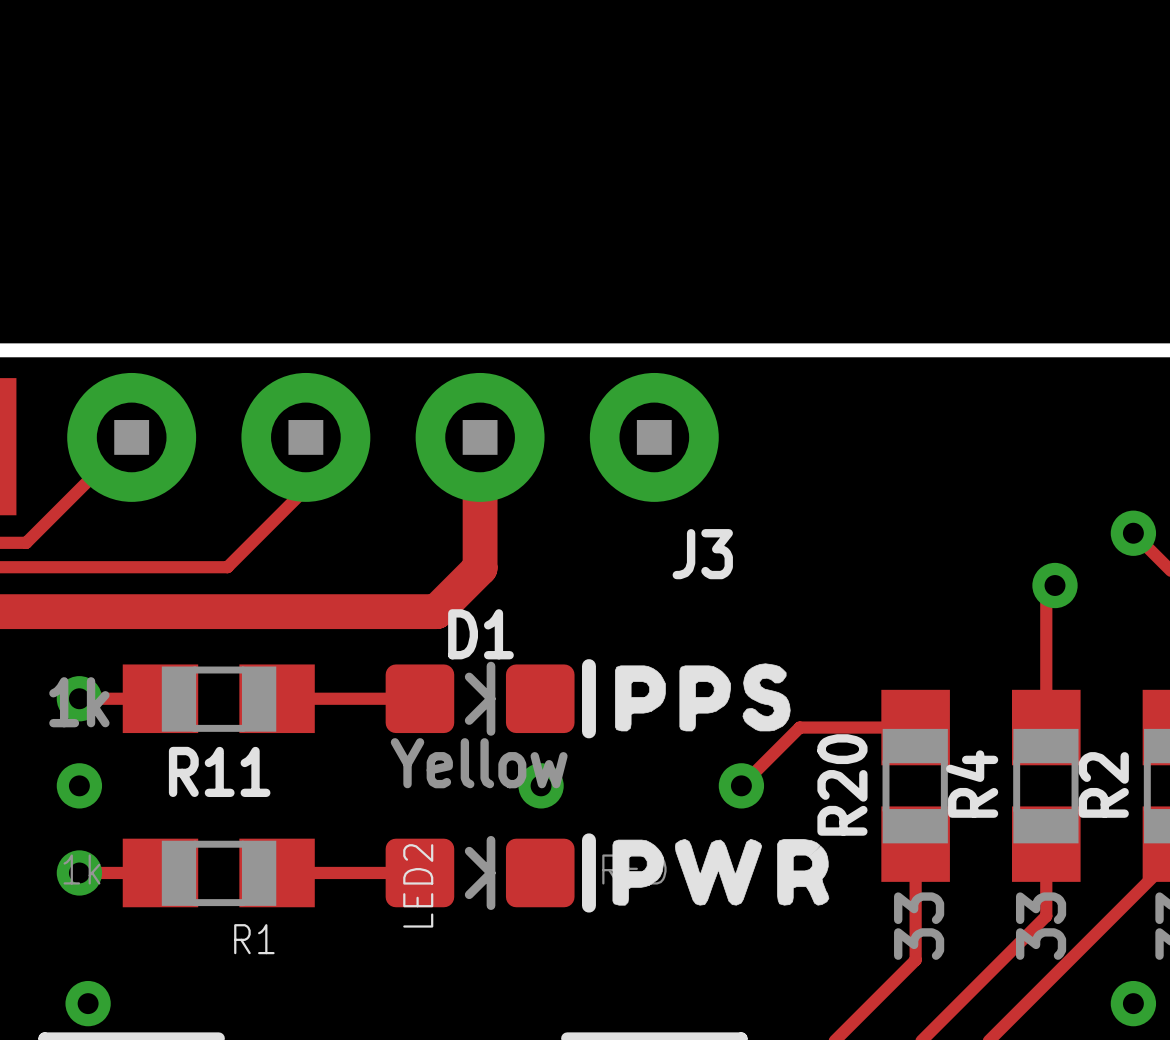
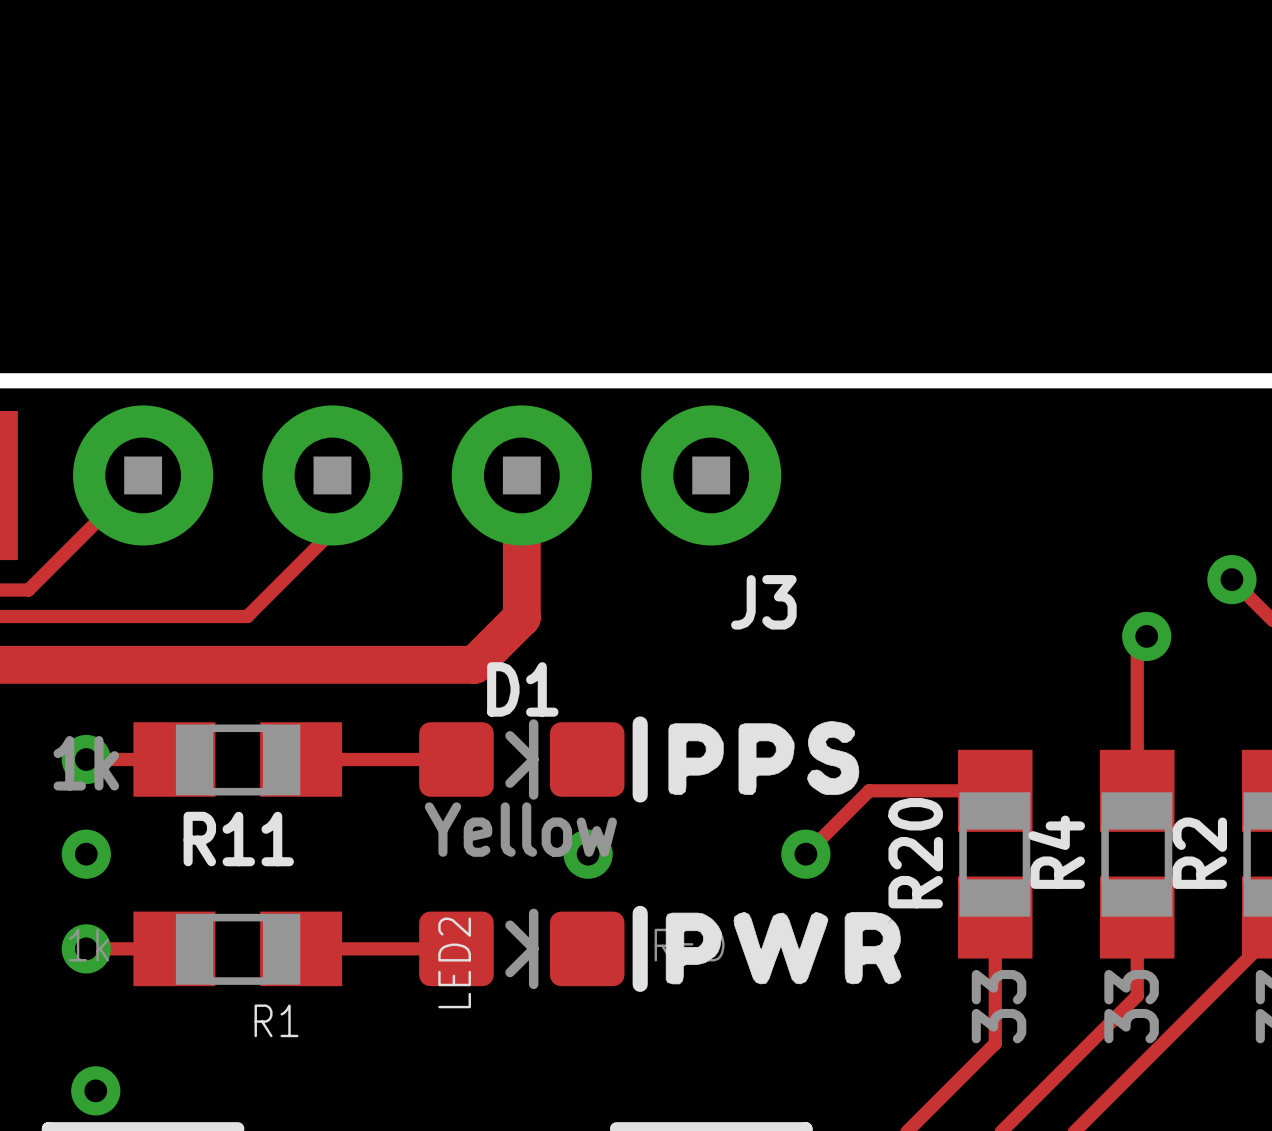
via: (1133, 1003) -> none

